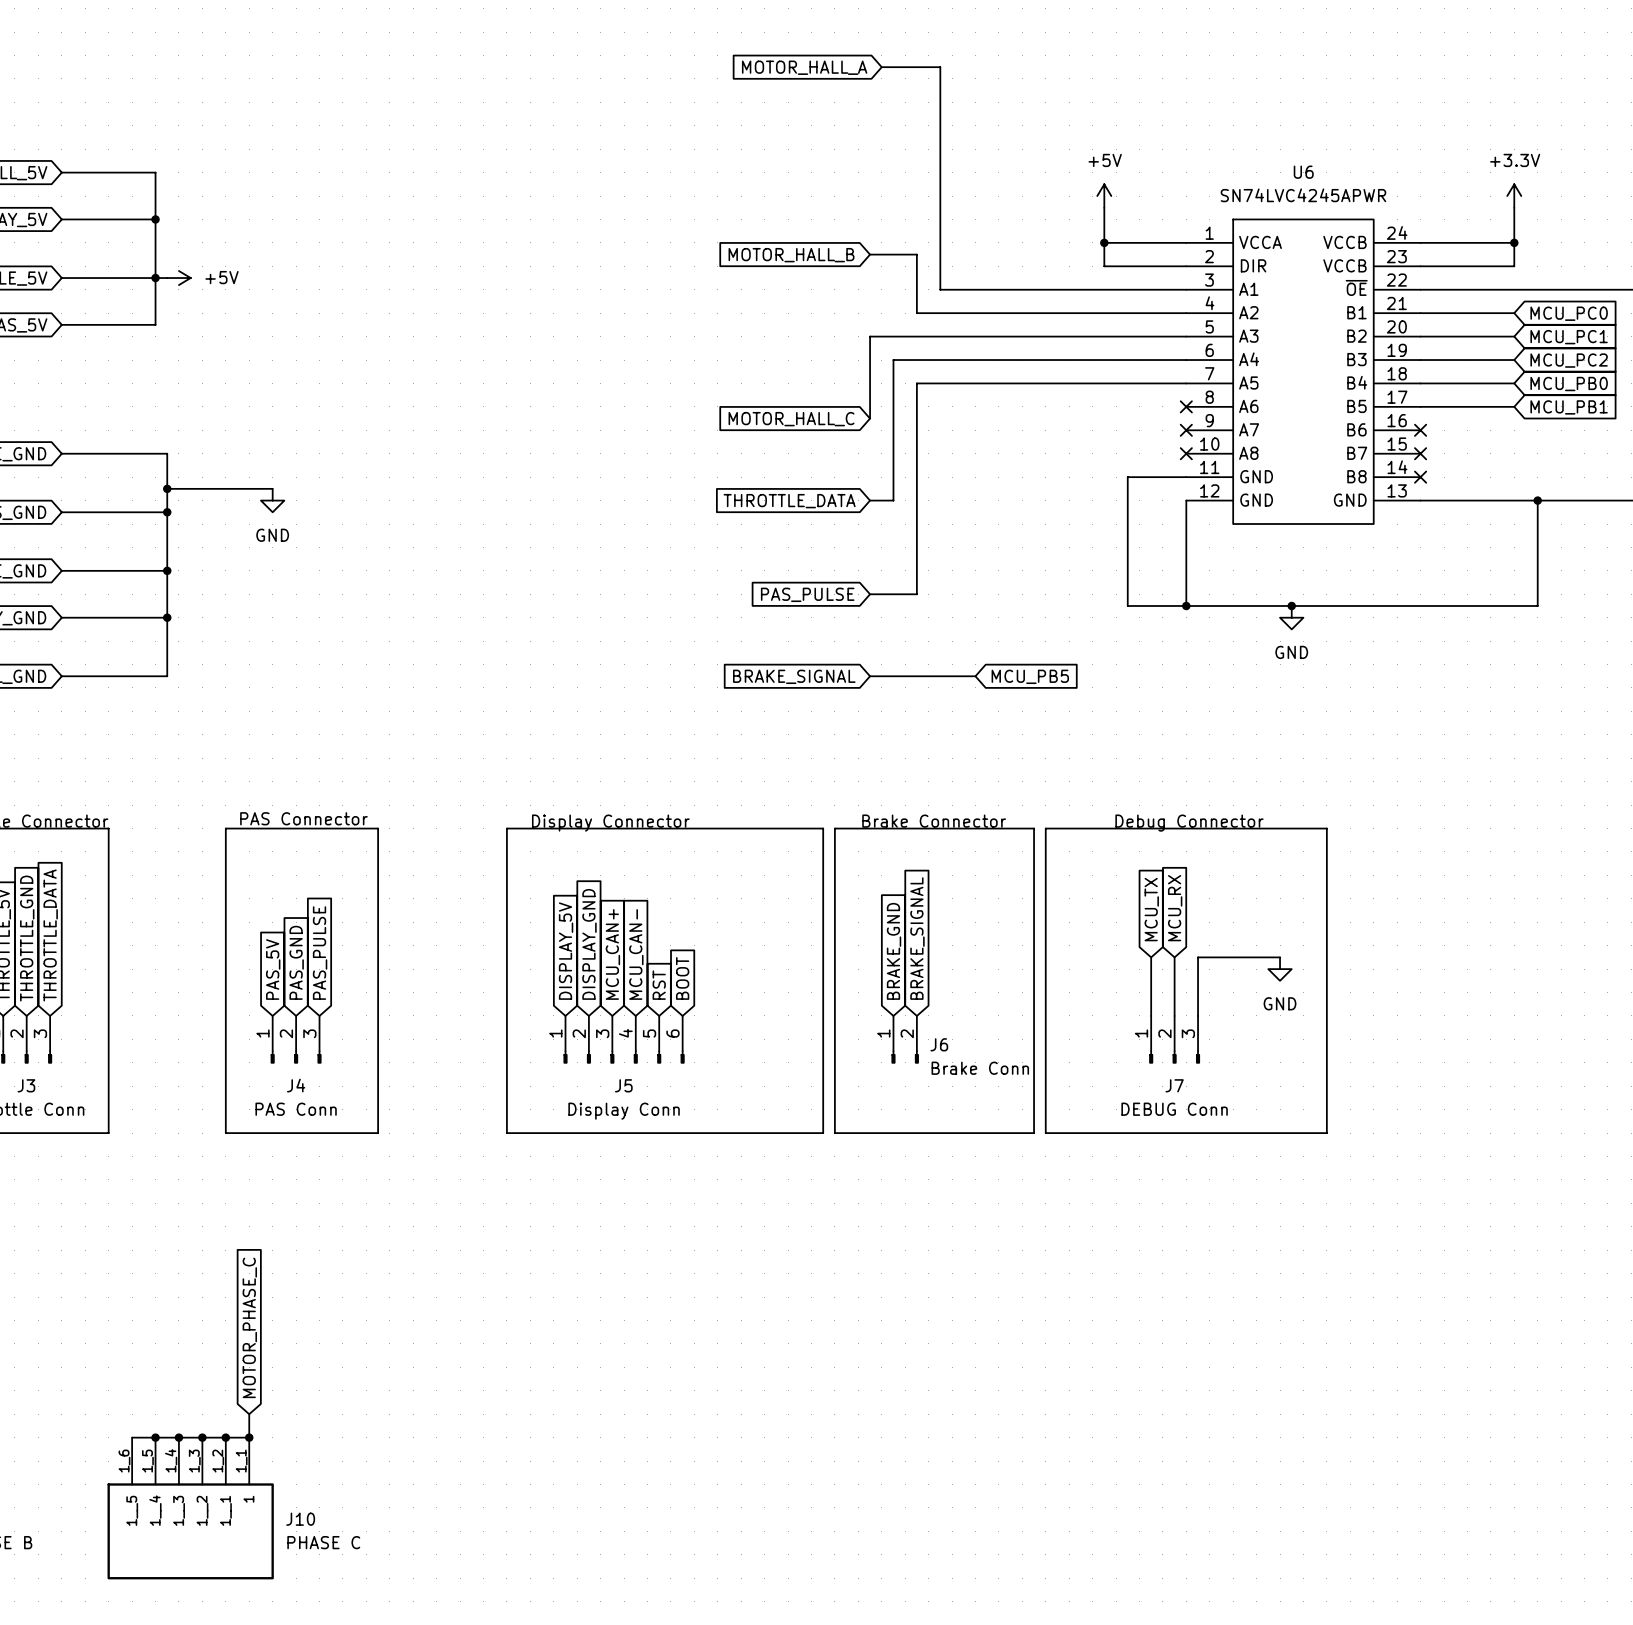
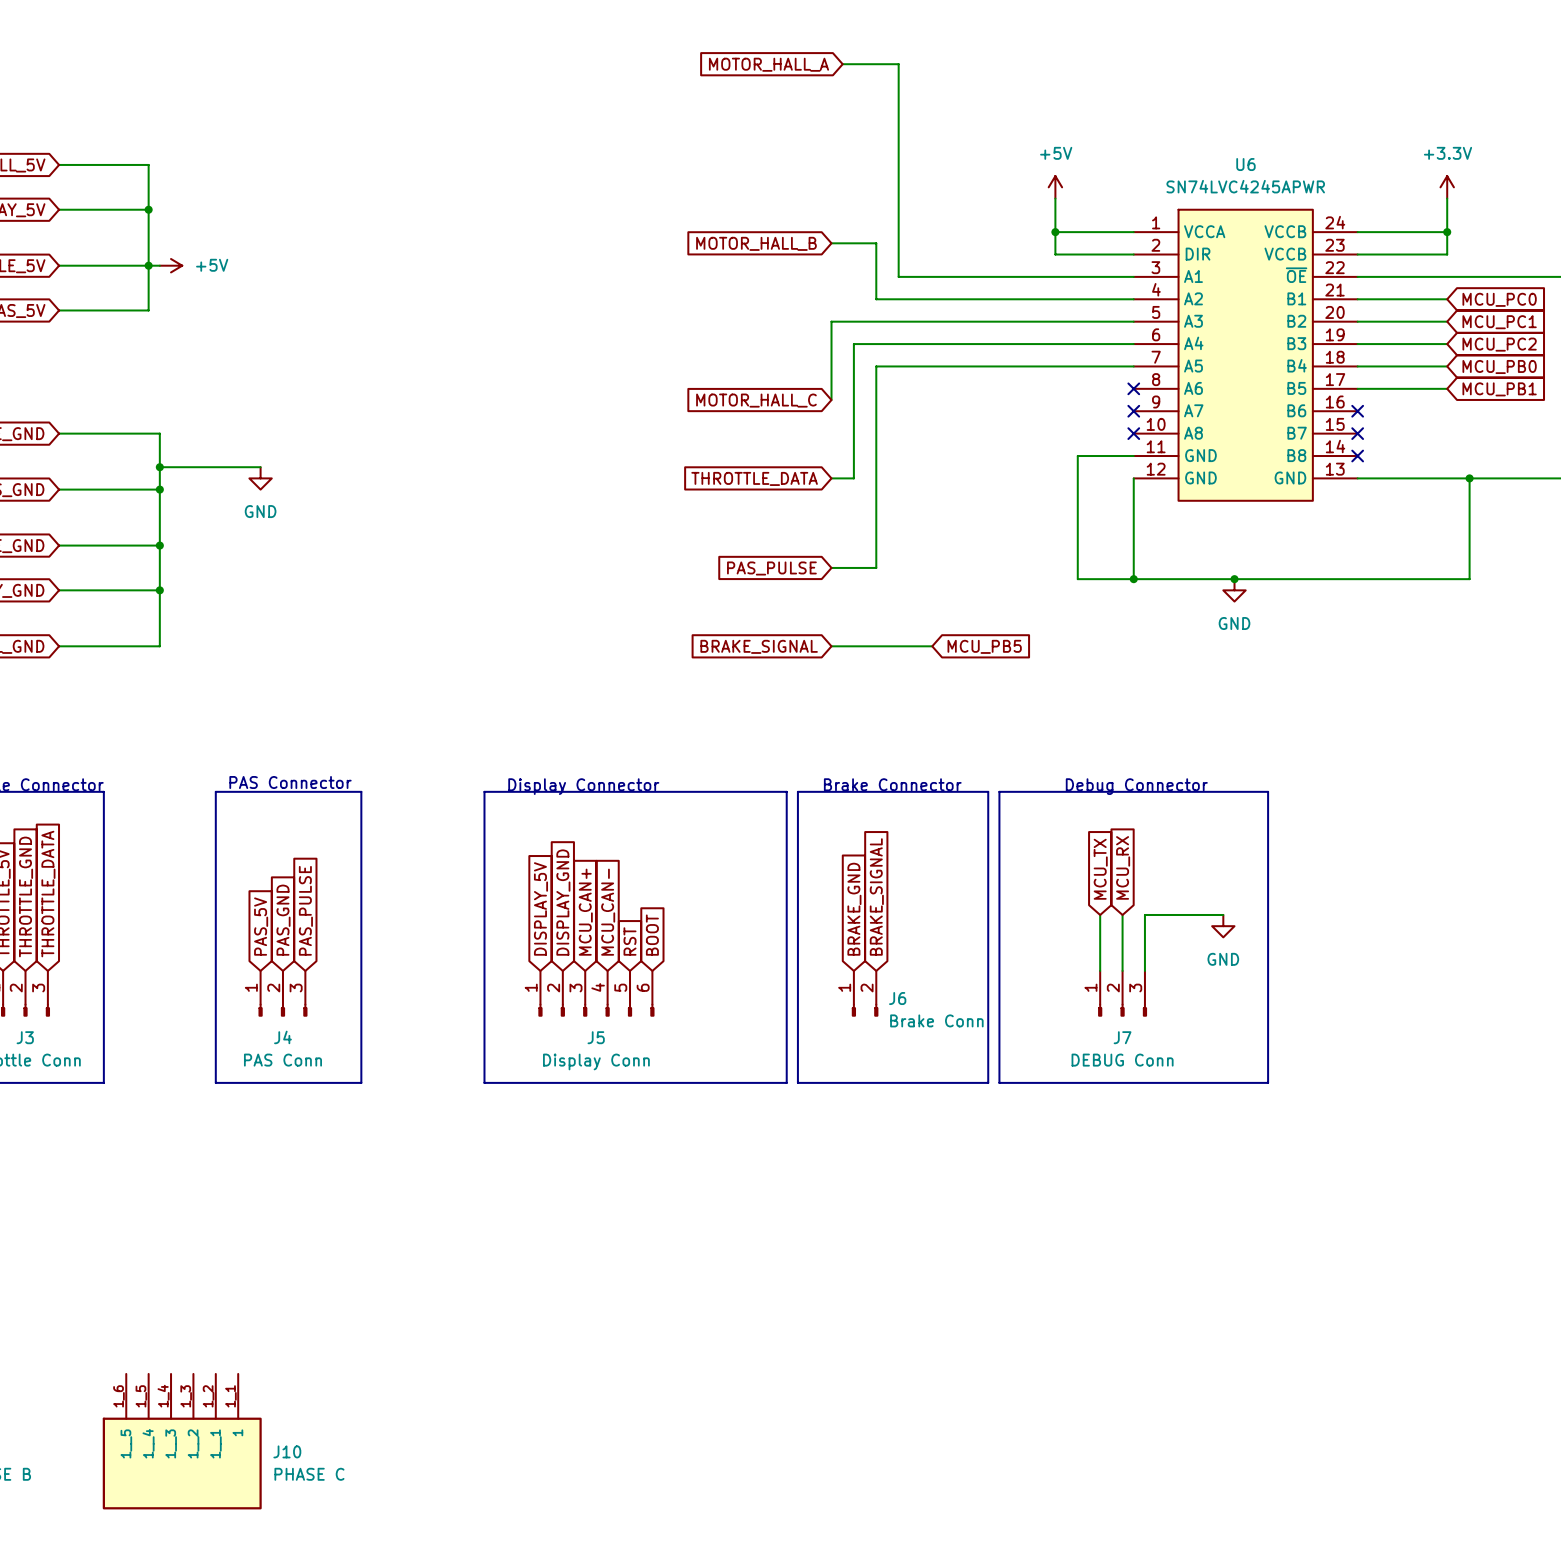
global label: MOTOR_PHASE_C (249, 1327) -> none
wire: (249, 1414) (249, 1437) (132, 1437) -> none
junction: (155, 1437) -> none
junction: (178, 1437) -> none
junction: (202, 1437) -> none
junction: (225, 1437) -> none
junction: (249, 1437) -> none

